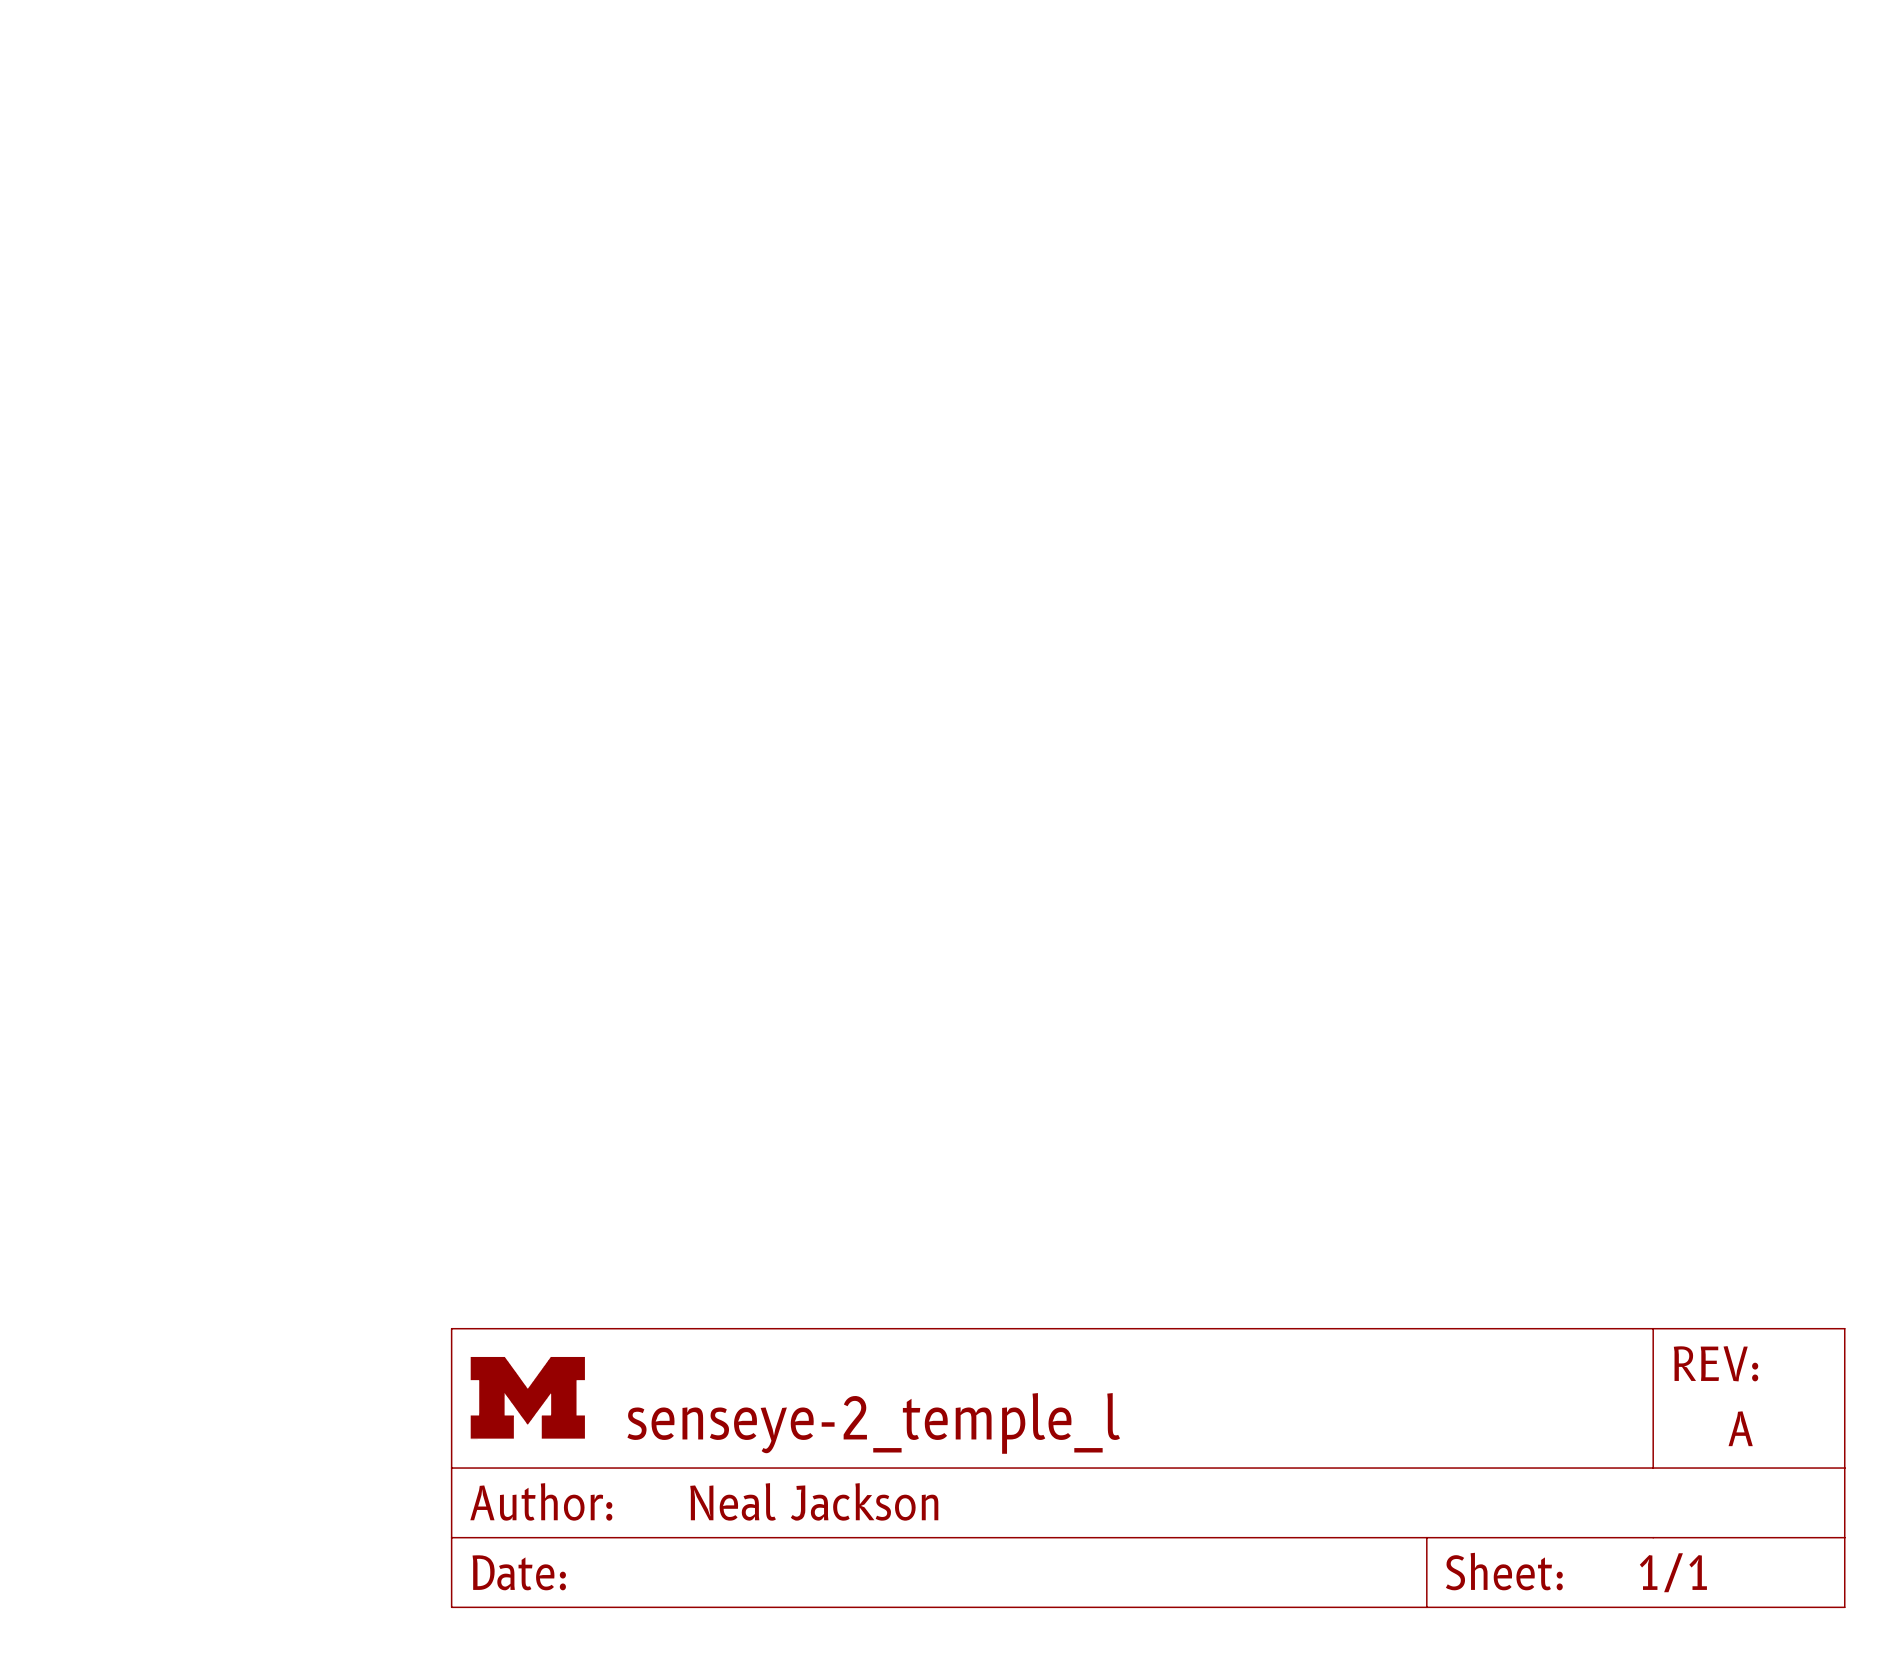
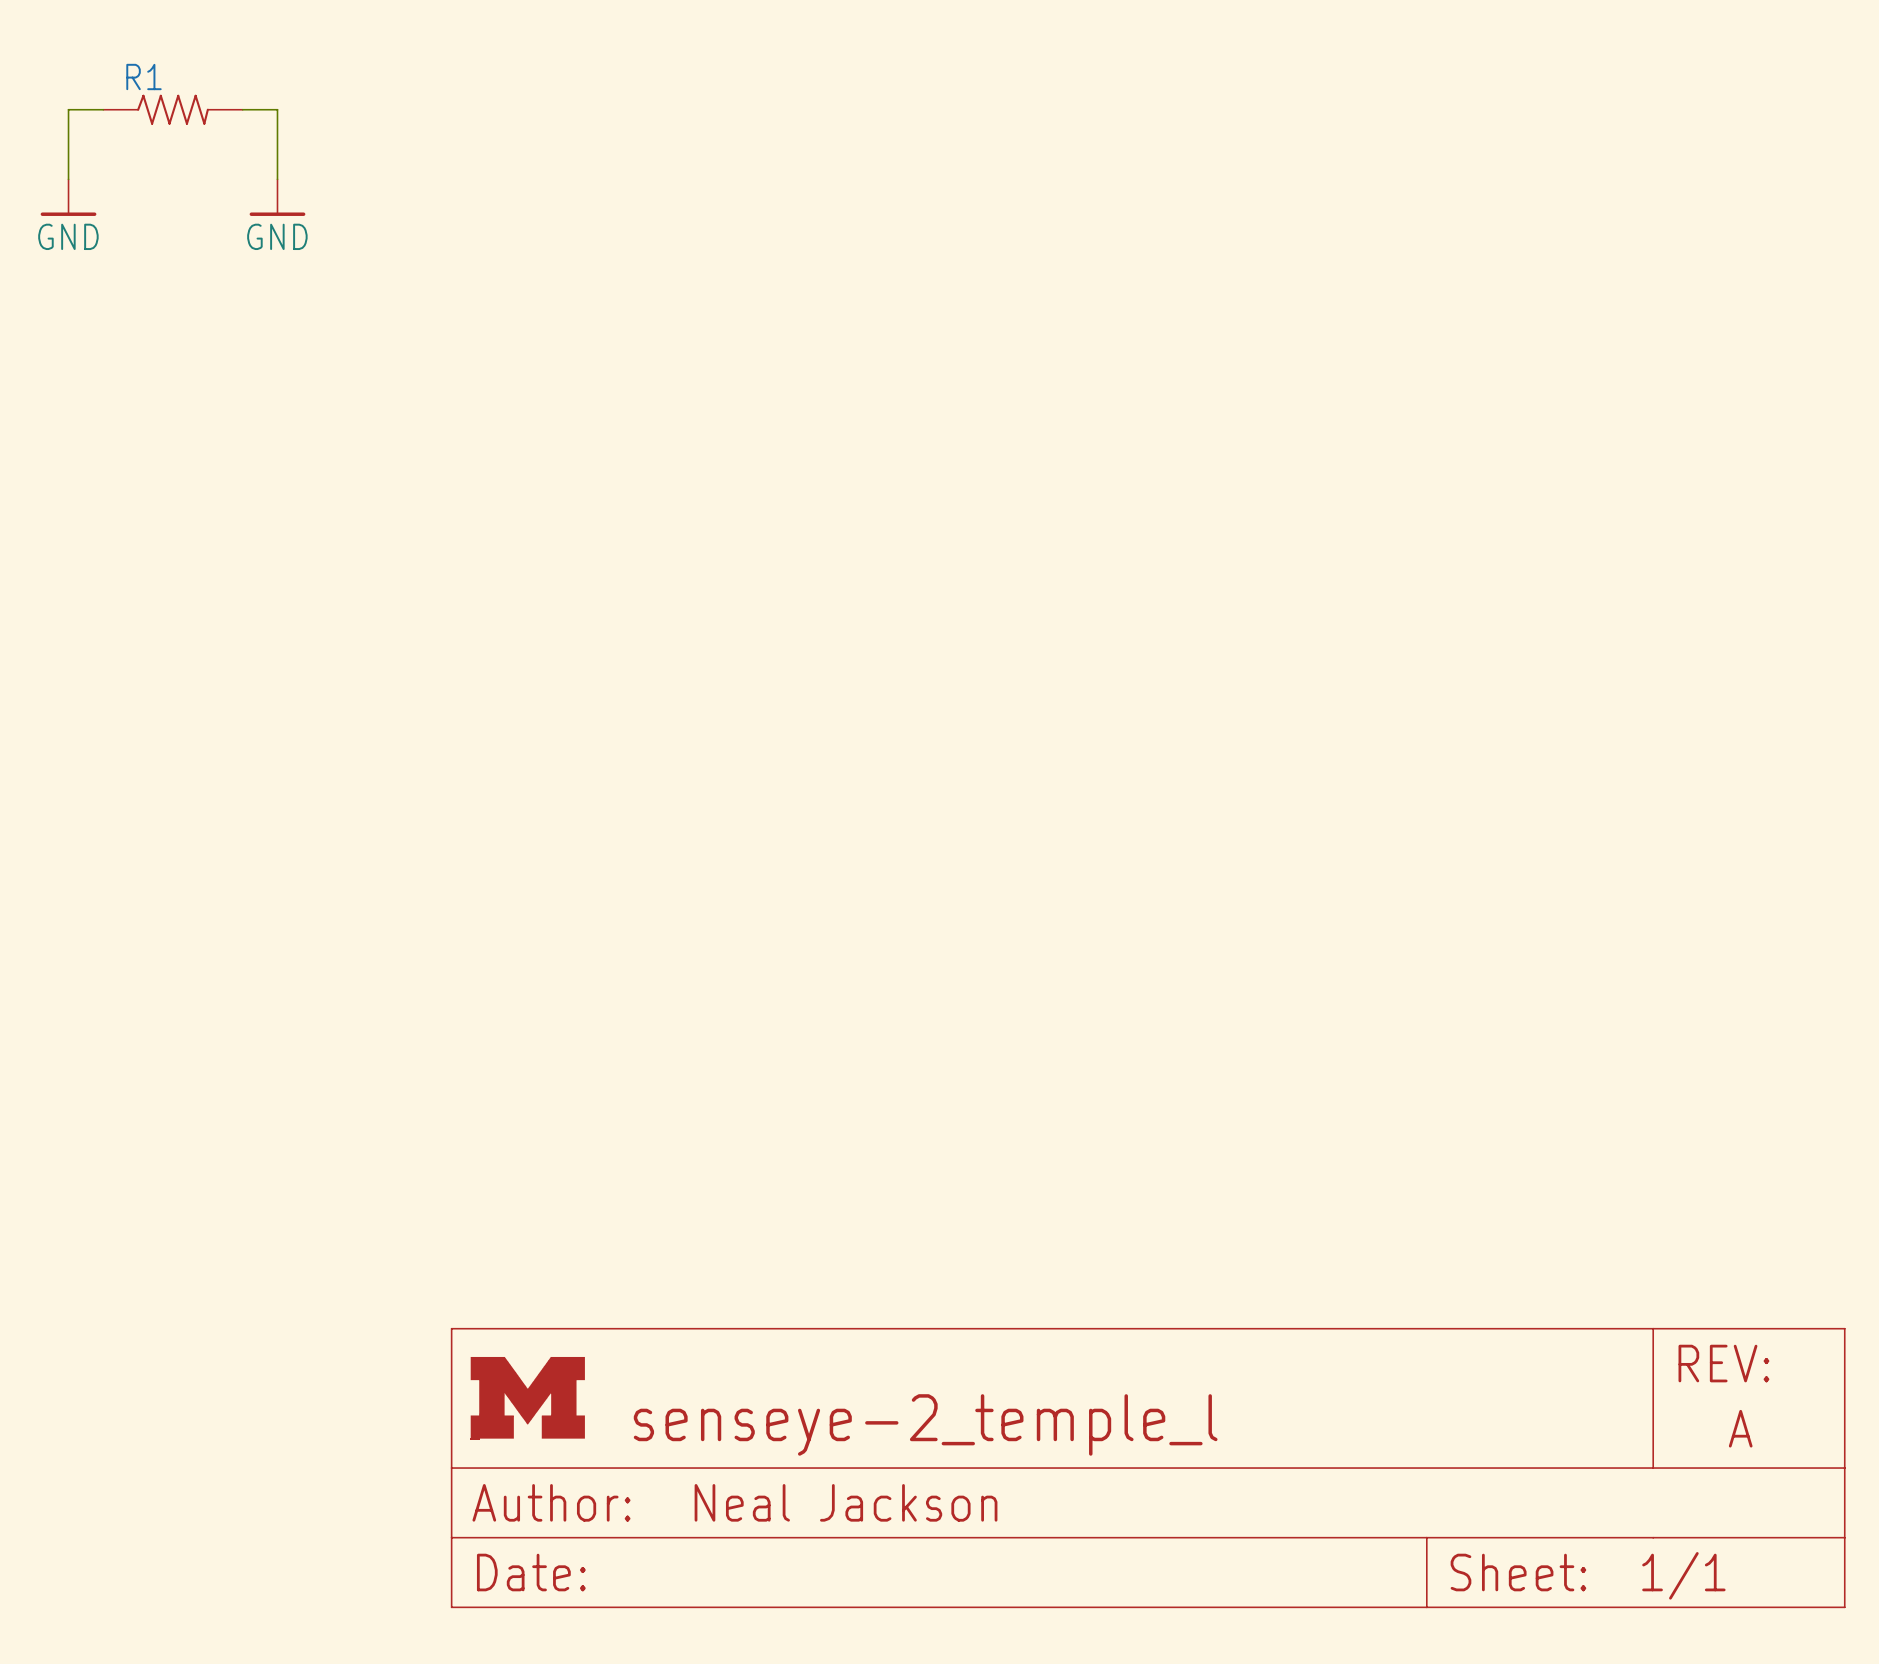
wire: none -> (103, 109) (68, 109) (68, 179)
R1: none -> (173, 109)
wire: none -> (242, 109) (277, 109) (277, 179)
power symbol: none -> GND (68, 197)
power symbol: none -> GND (277, 197)

